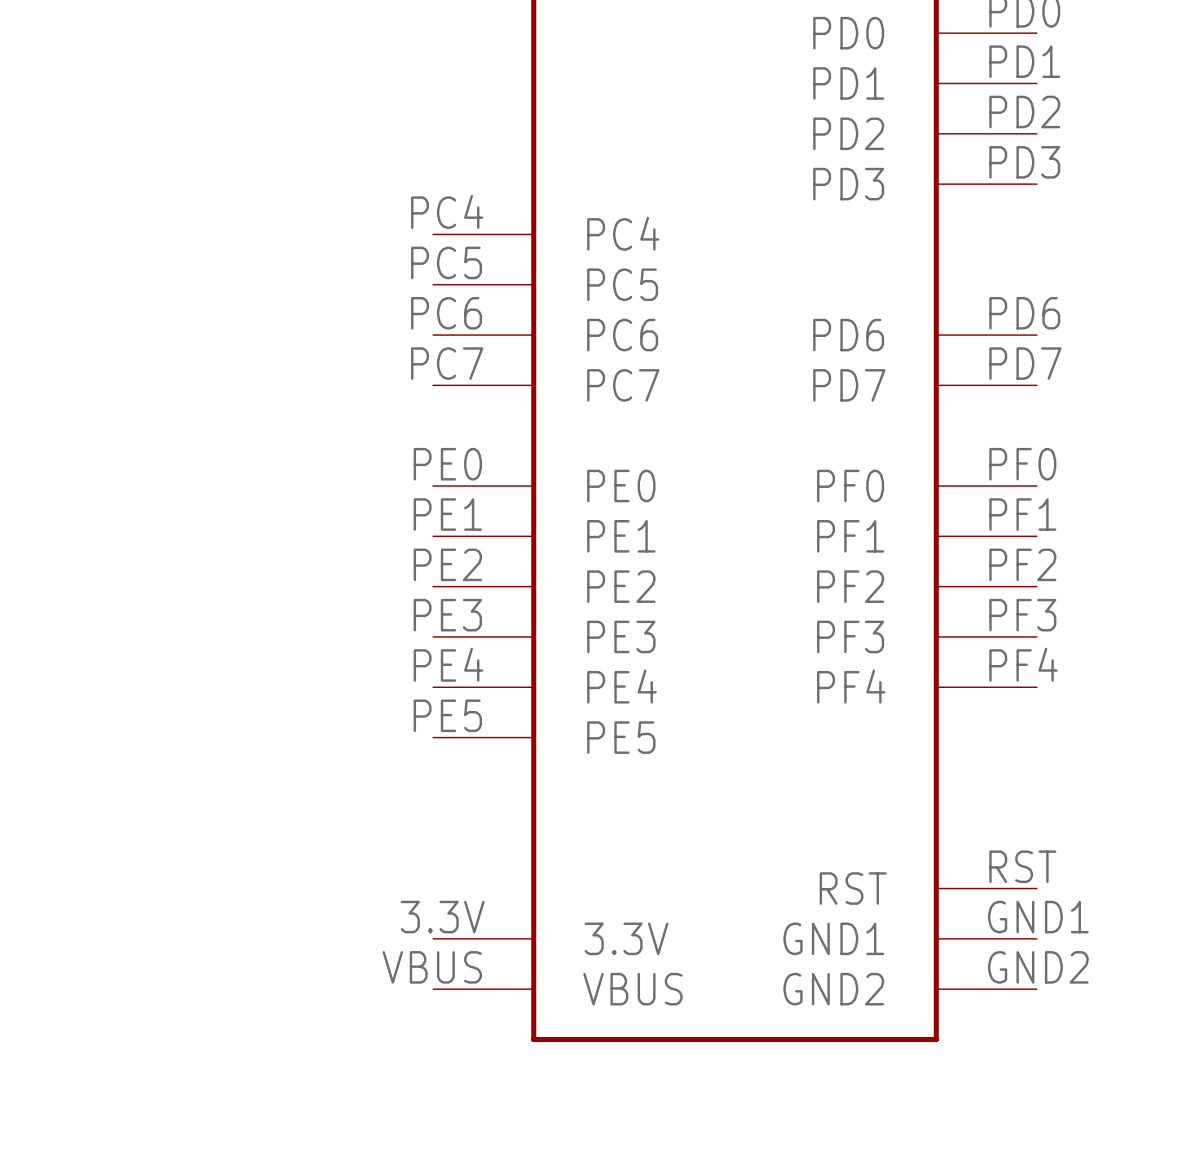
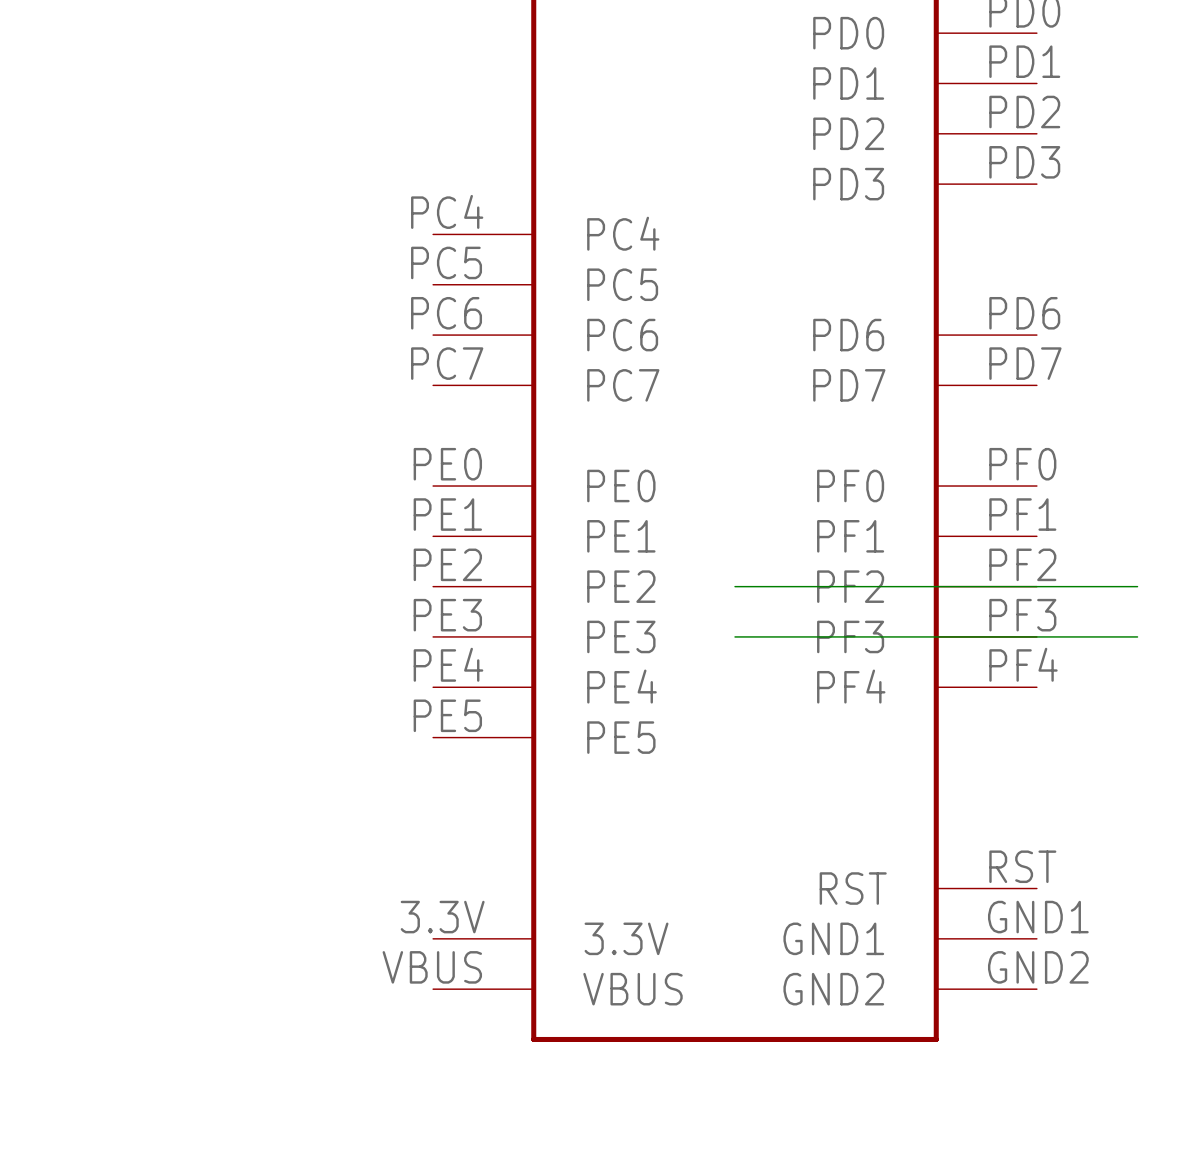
wire: none -> (735, 586) (1137, 586)
wire: none -> (735, 636) (1137, 636)

